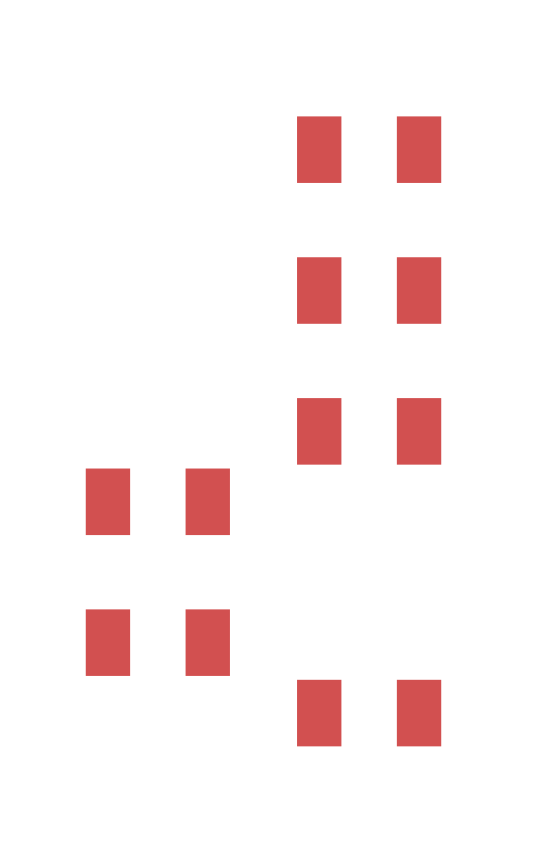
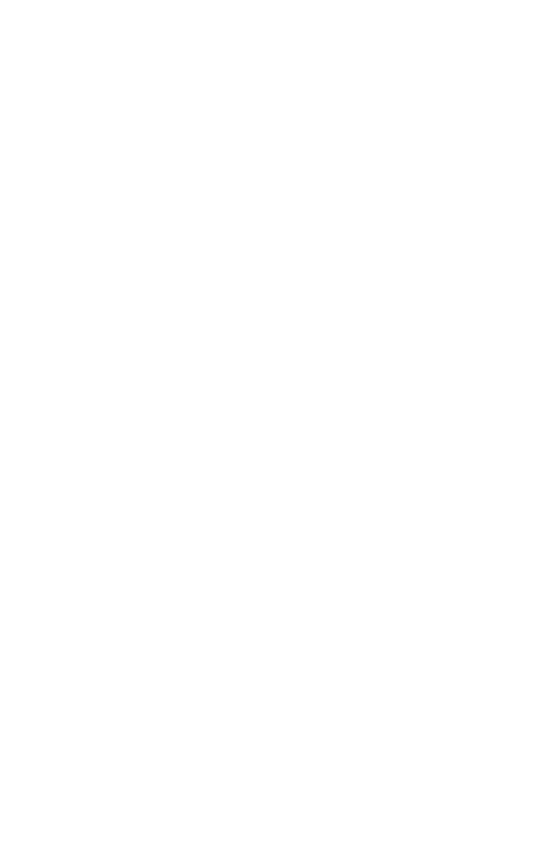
part: (369, 149) -> none
part: (369, 290) -> none
part: (369, 431) -> none
part: (157, 501) -> none
part: (157, 642) -> none
part: (369, 713) -> none

